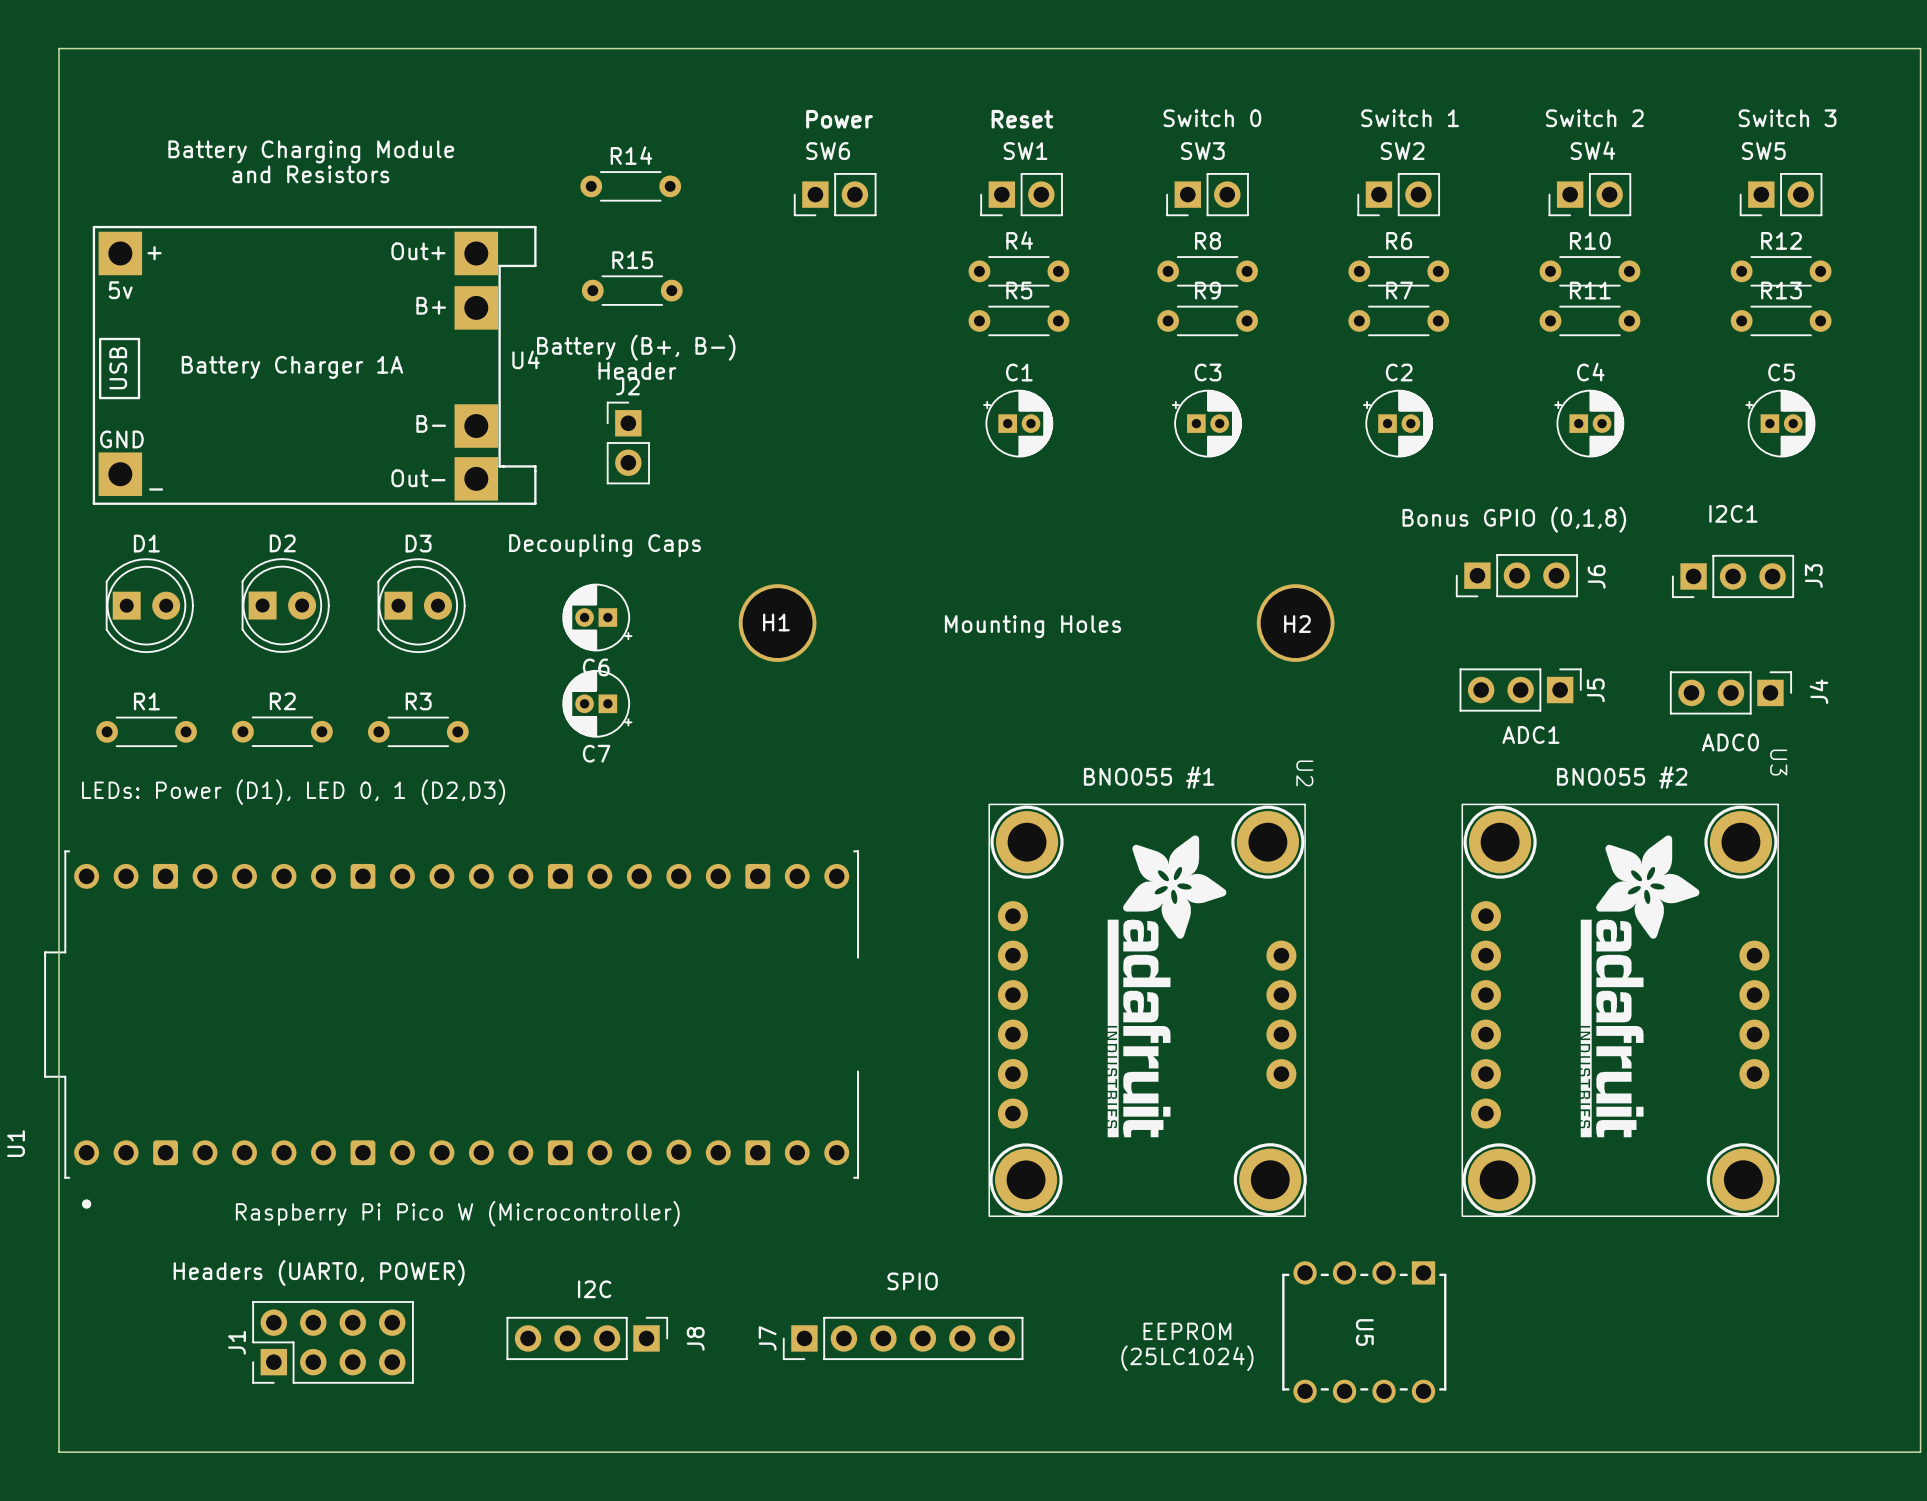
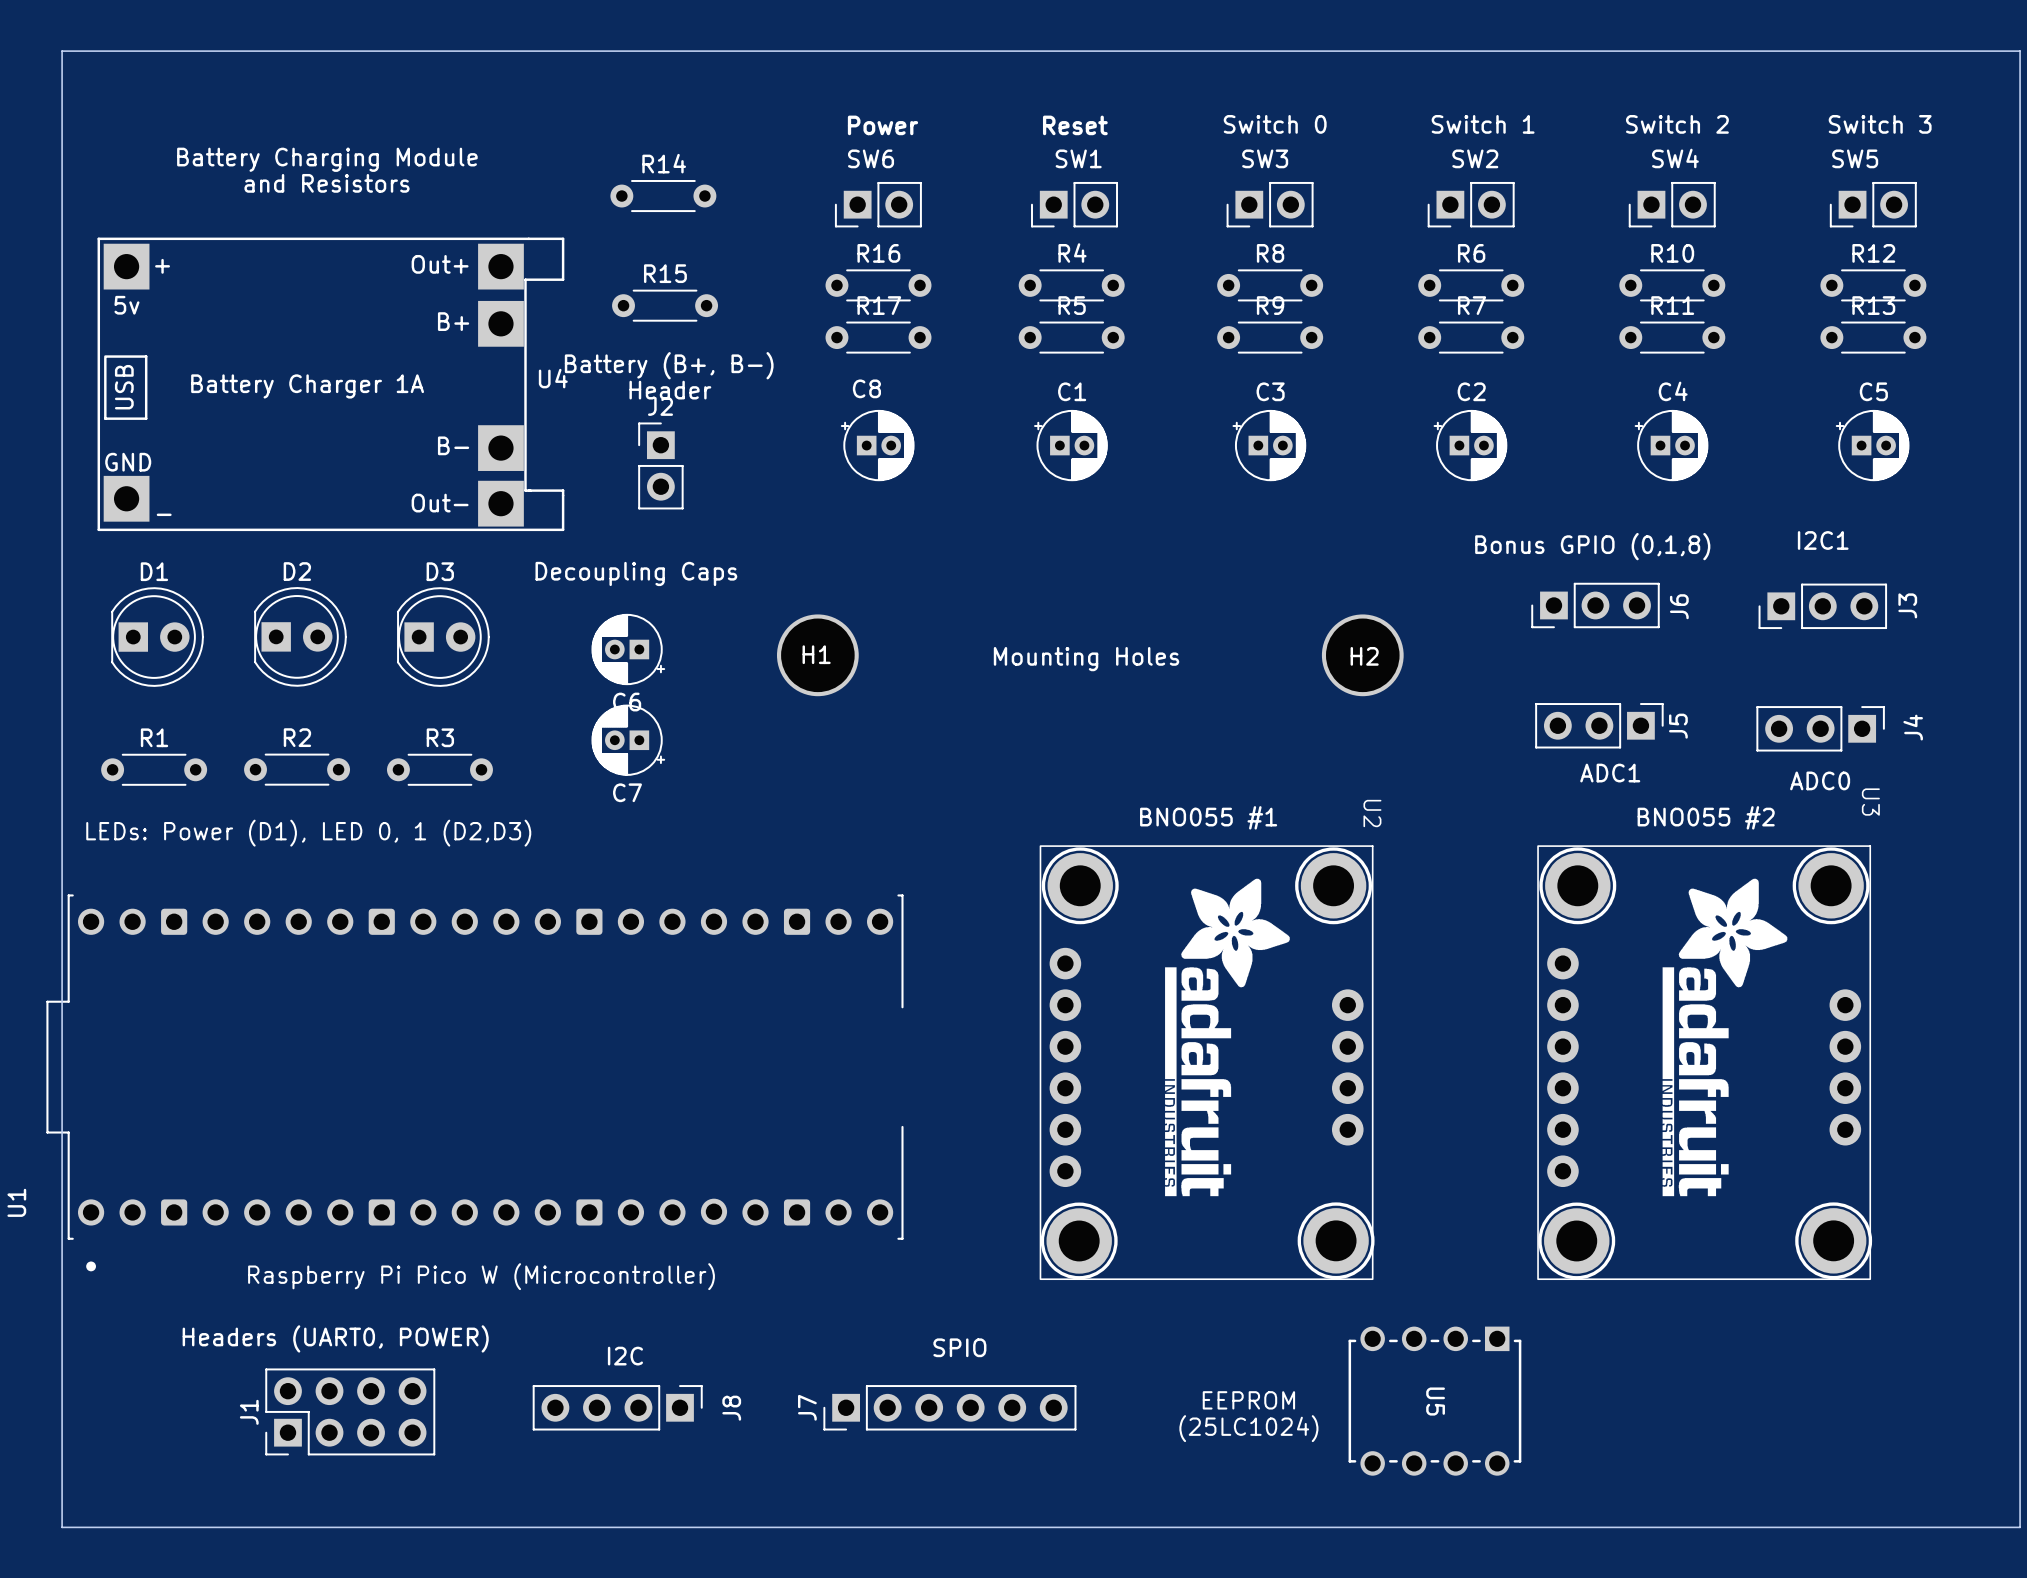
R16: none -> (878, 285)
R17: none -> (878, 337)
C8: none -> (877, 445)

